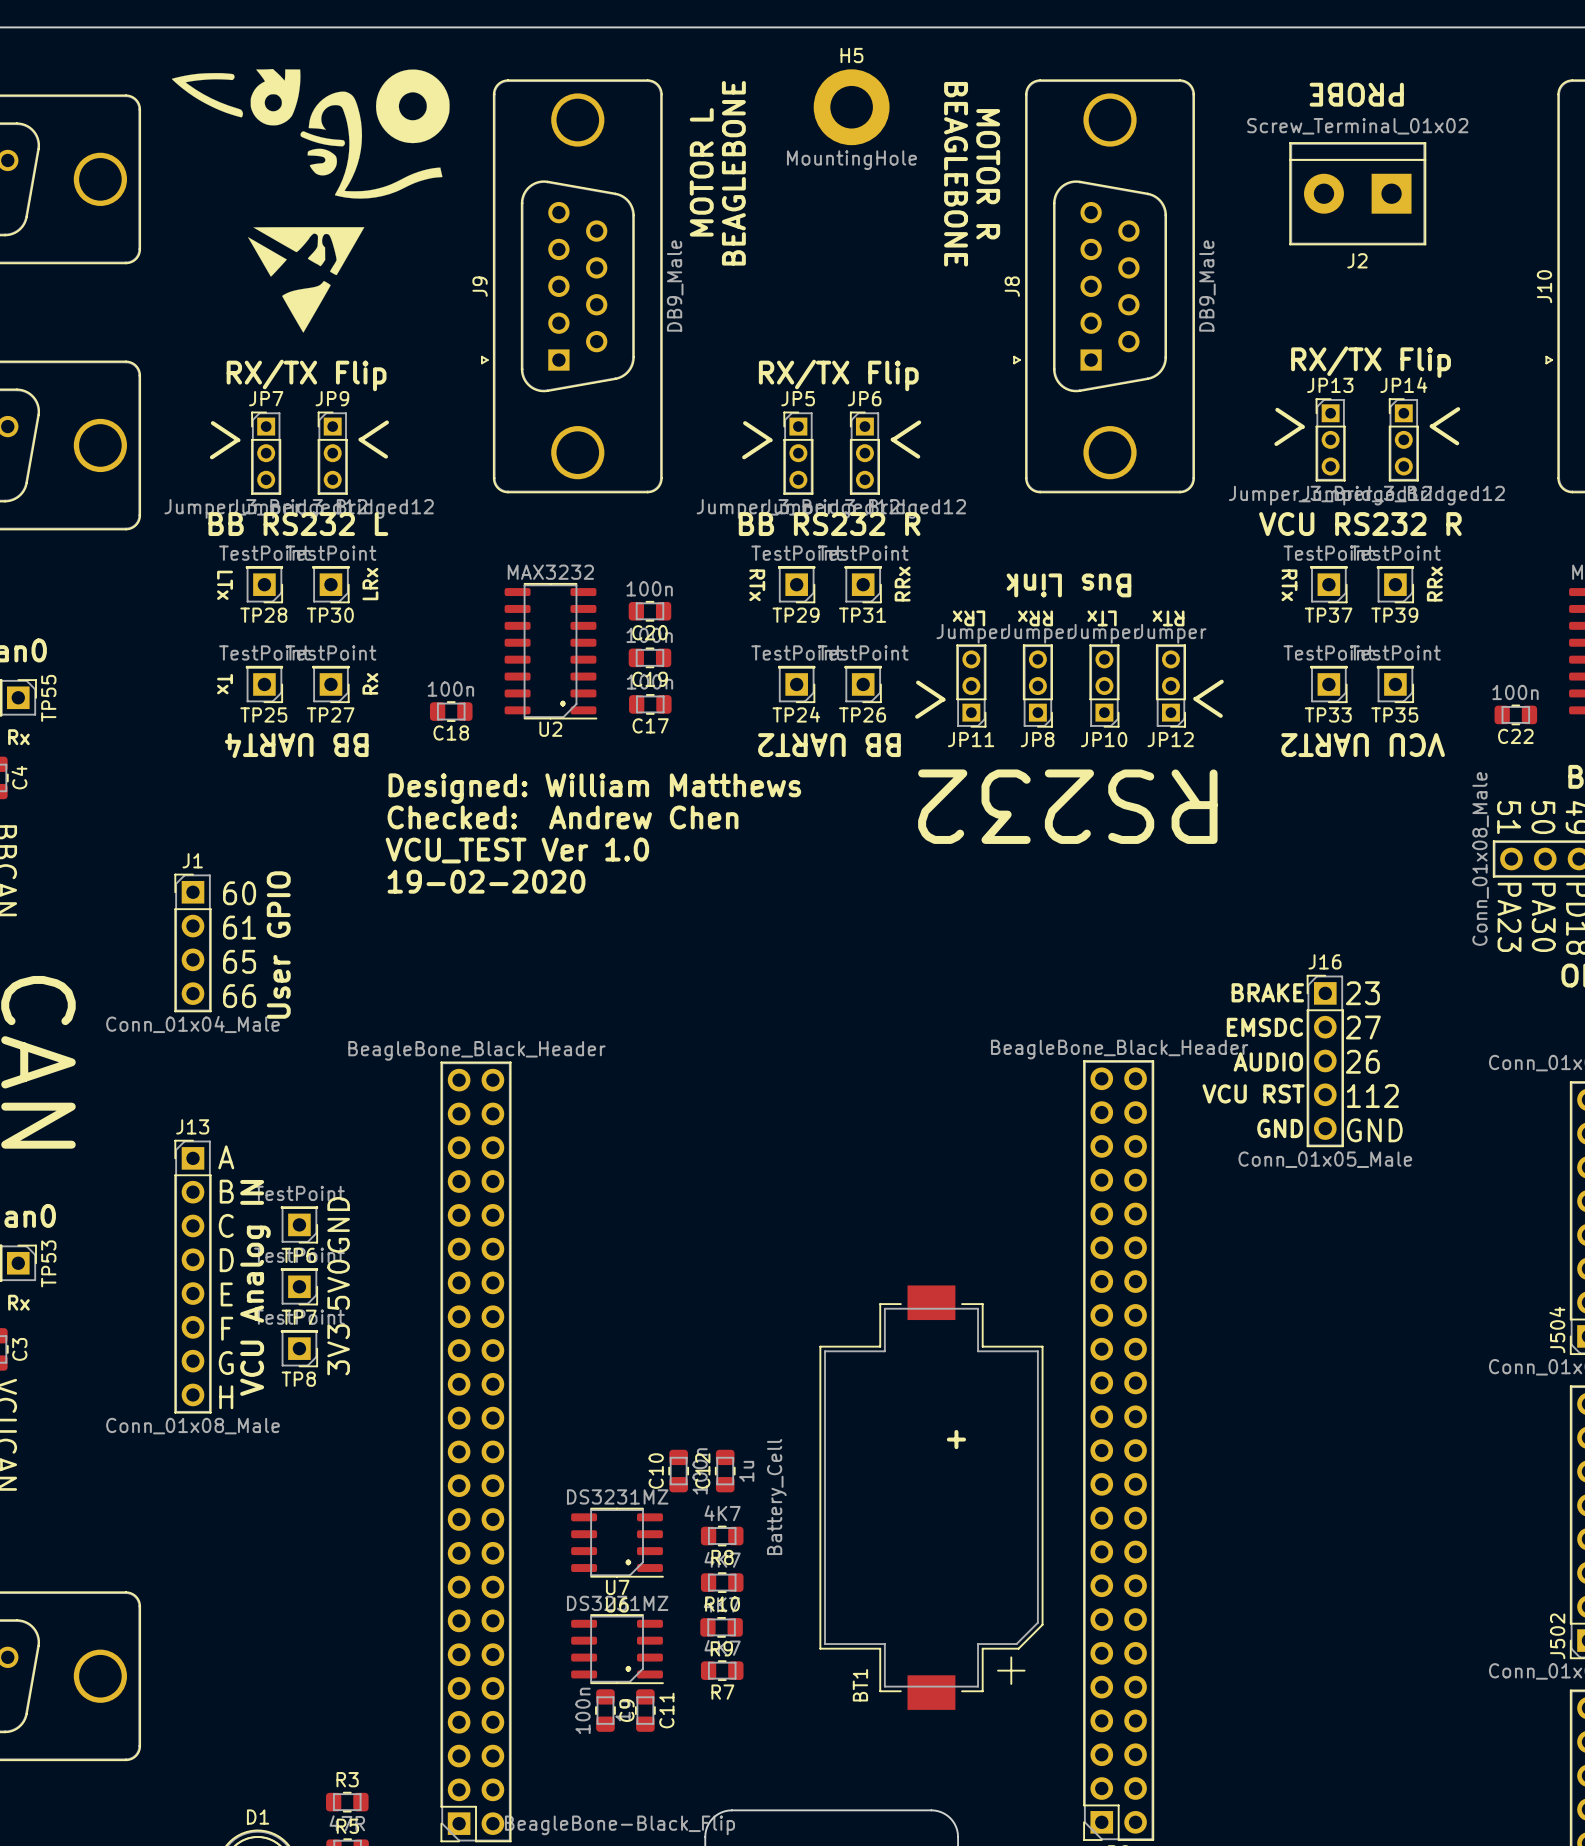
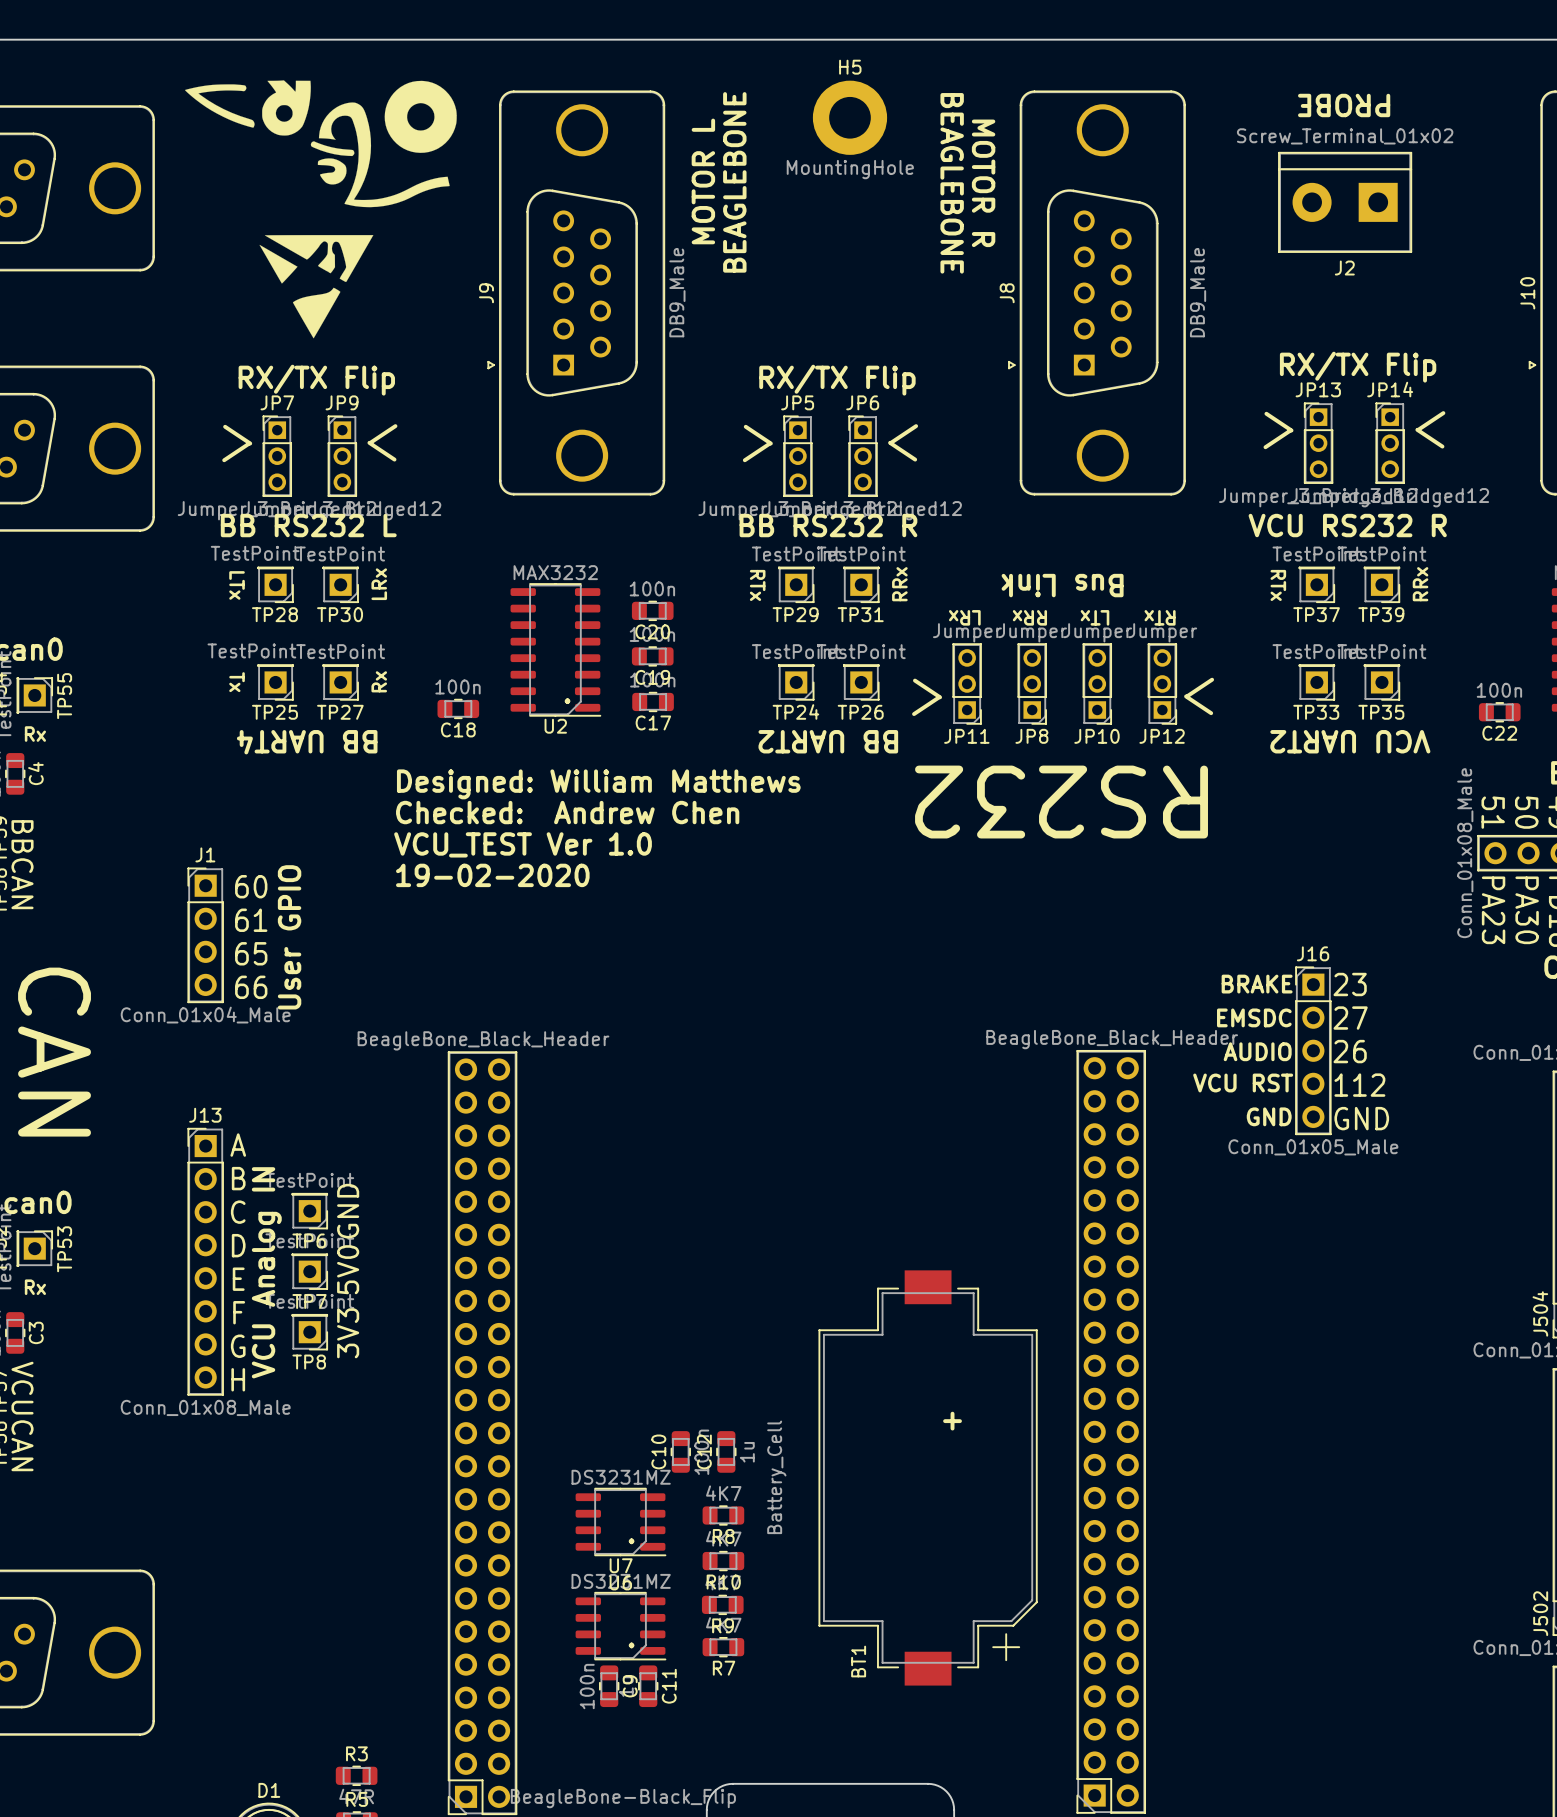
TP28 value position: TestPoint (264, 553) -> TestPoint (255, 553)
TP25 value position: TestPoint (264, 652) -> TestPoint (251, 650)

